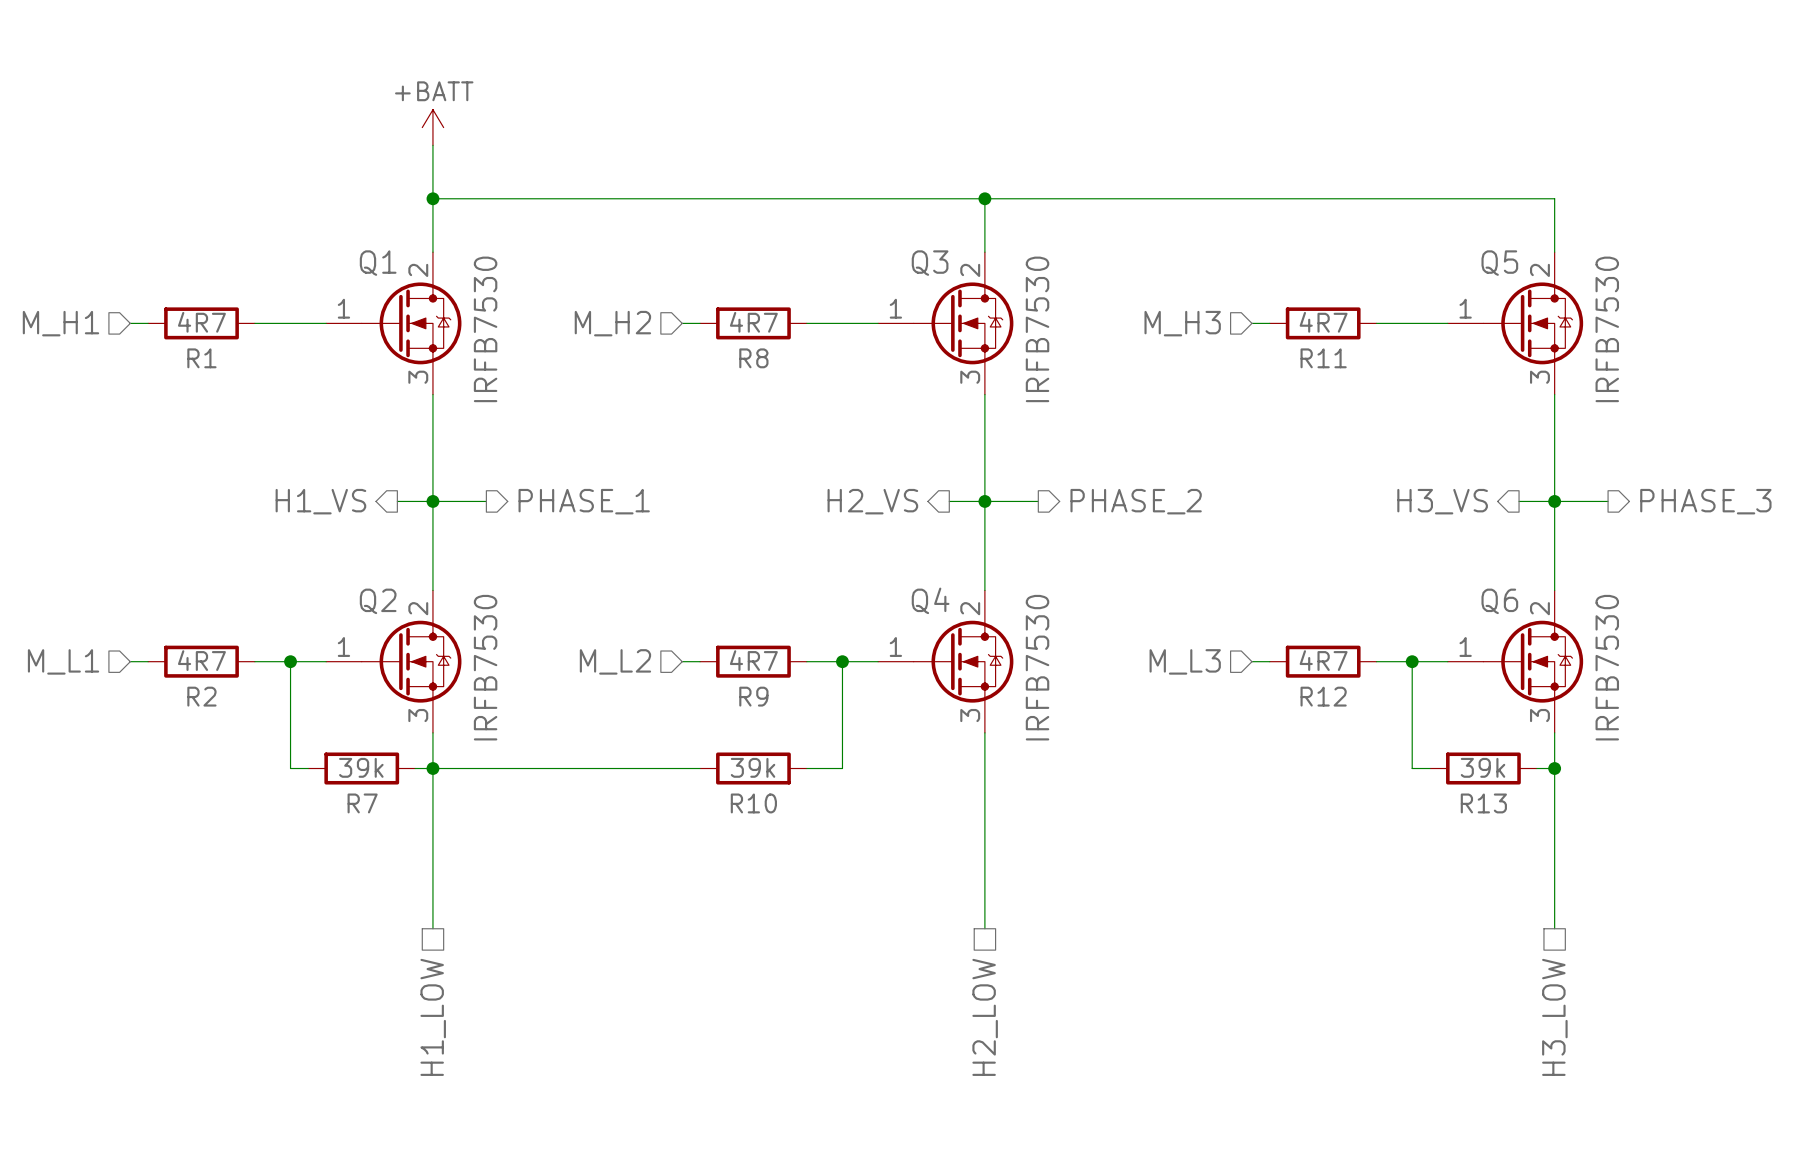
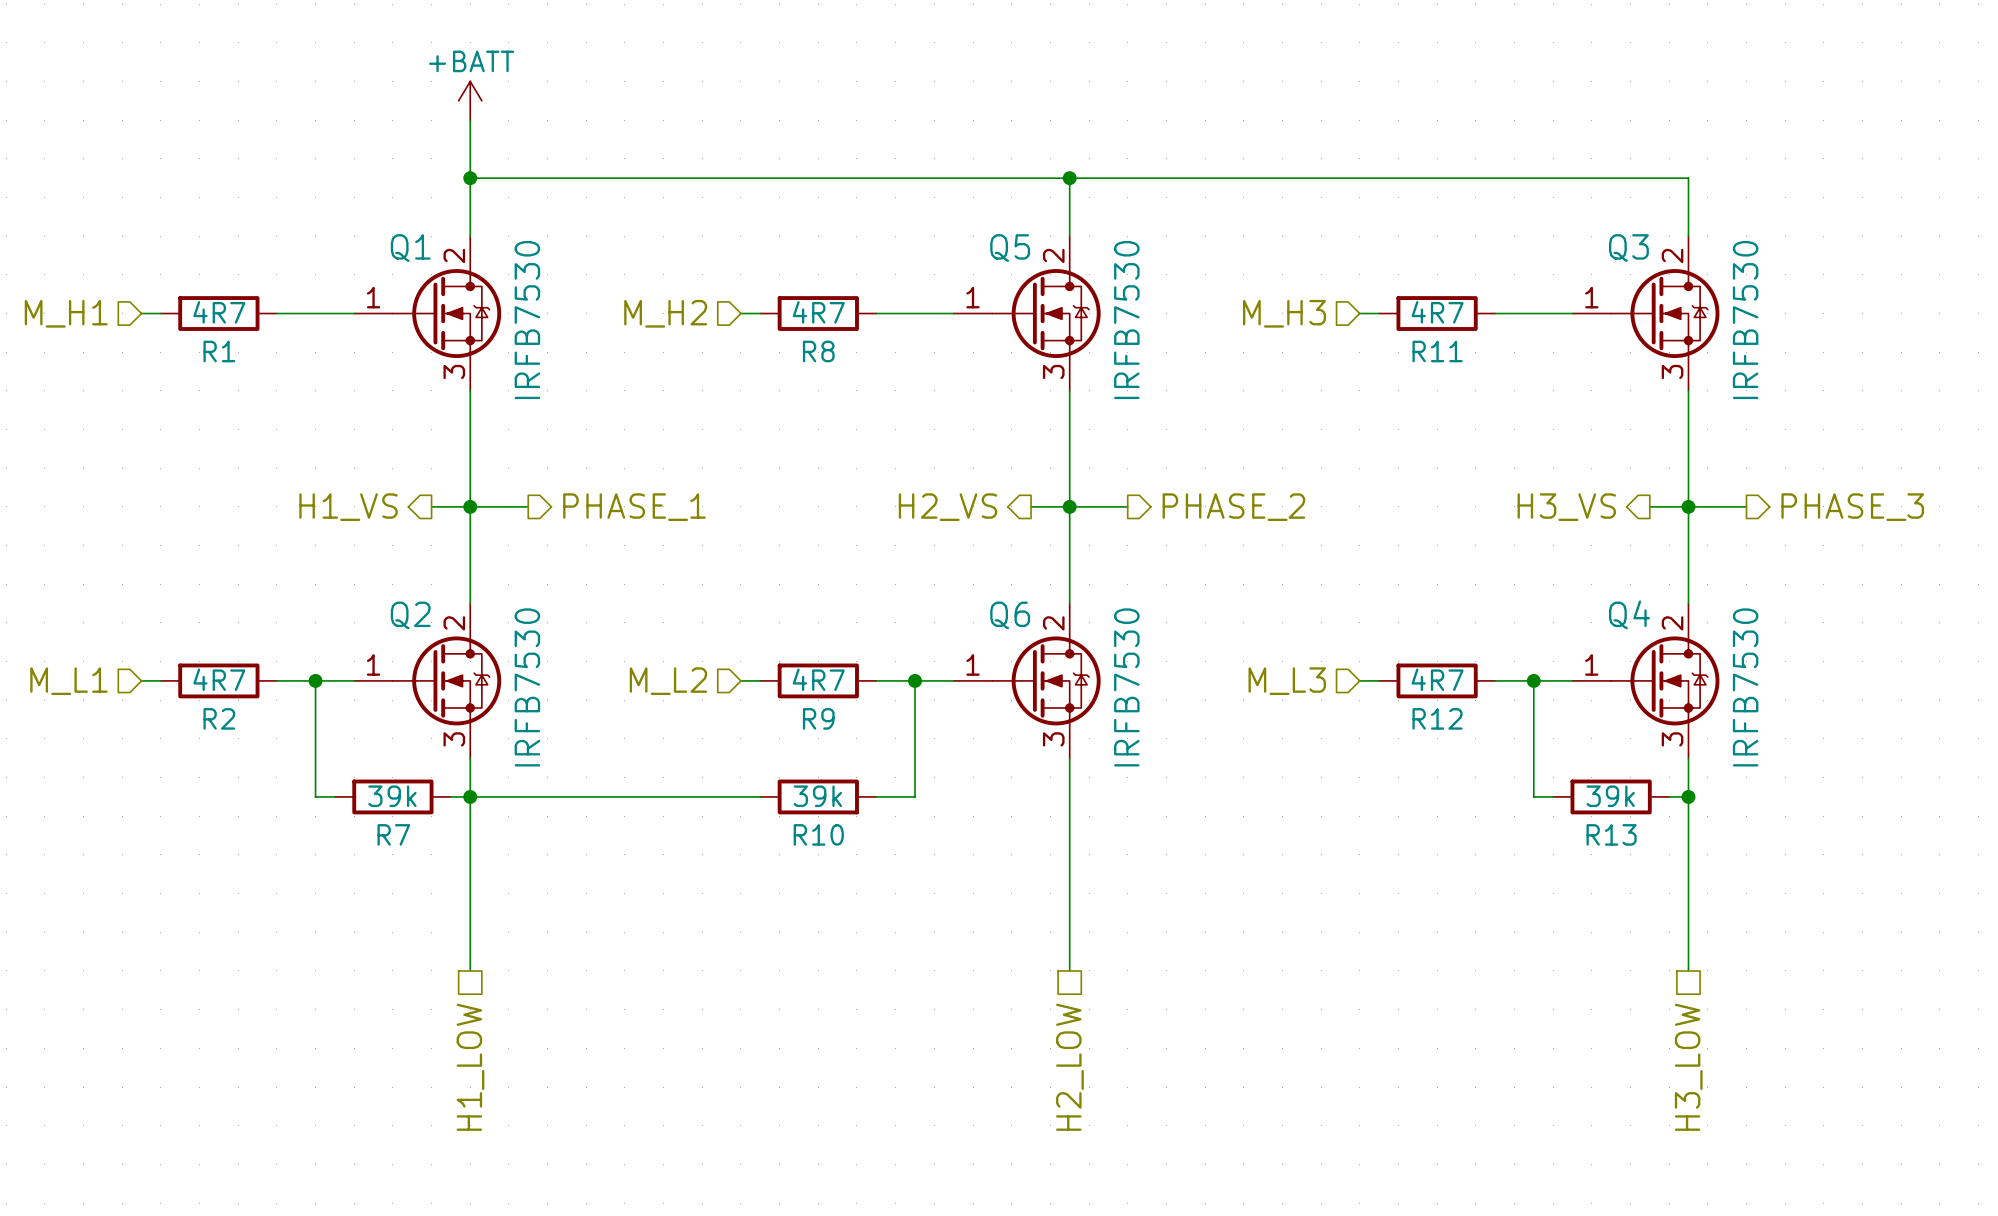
Q3 name: Q3 (930, 263) -> Q5 (1010, 248)
Q5 name: Q5 (1499, 263) -> Q3 (1628, 248)
Q4 name: Q4 (930, 600) -> Q6 (1010, 615)
Q6 name: Q6 (1499, 601) -> Q4 (1629, 614)

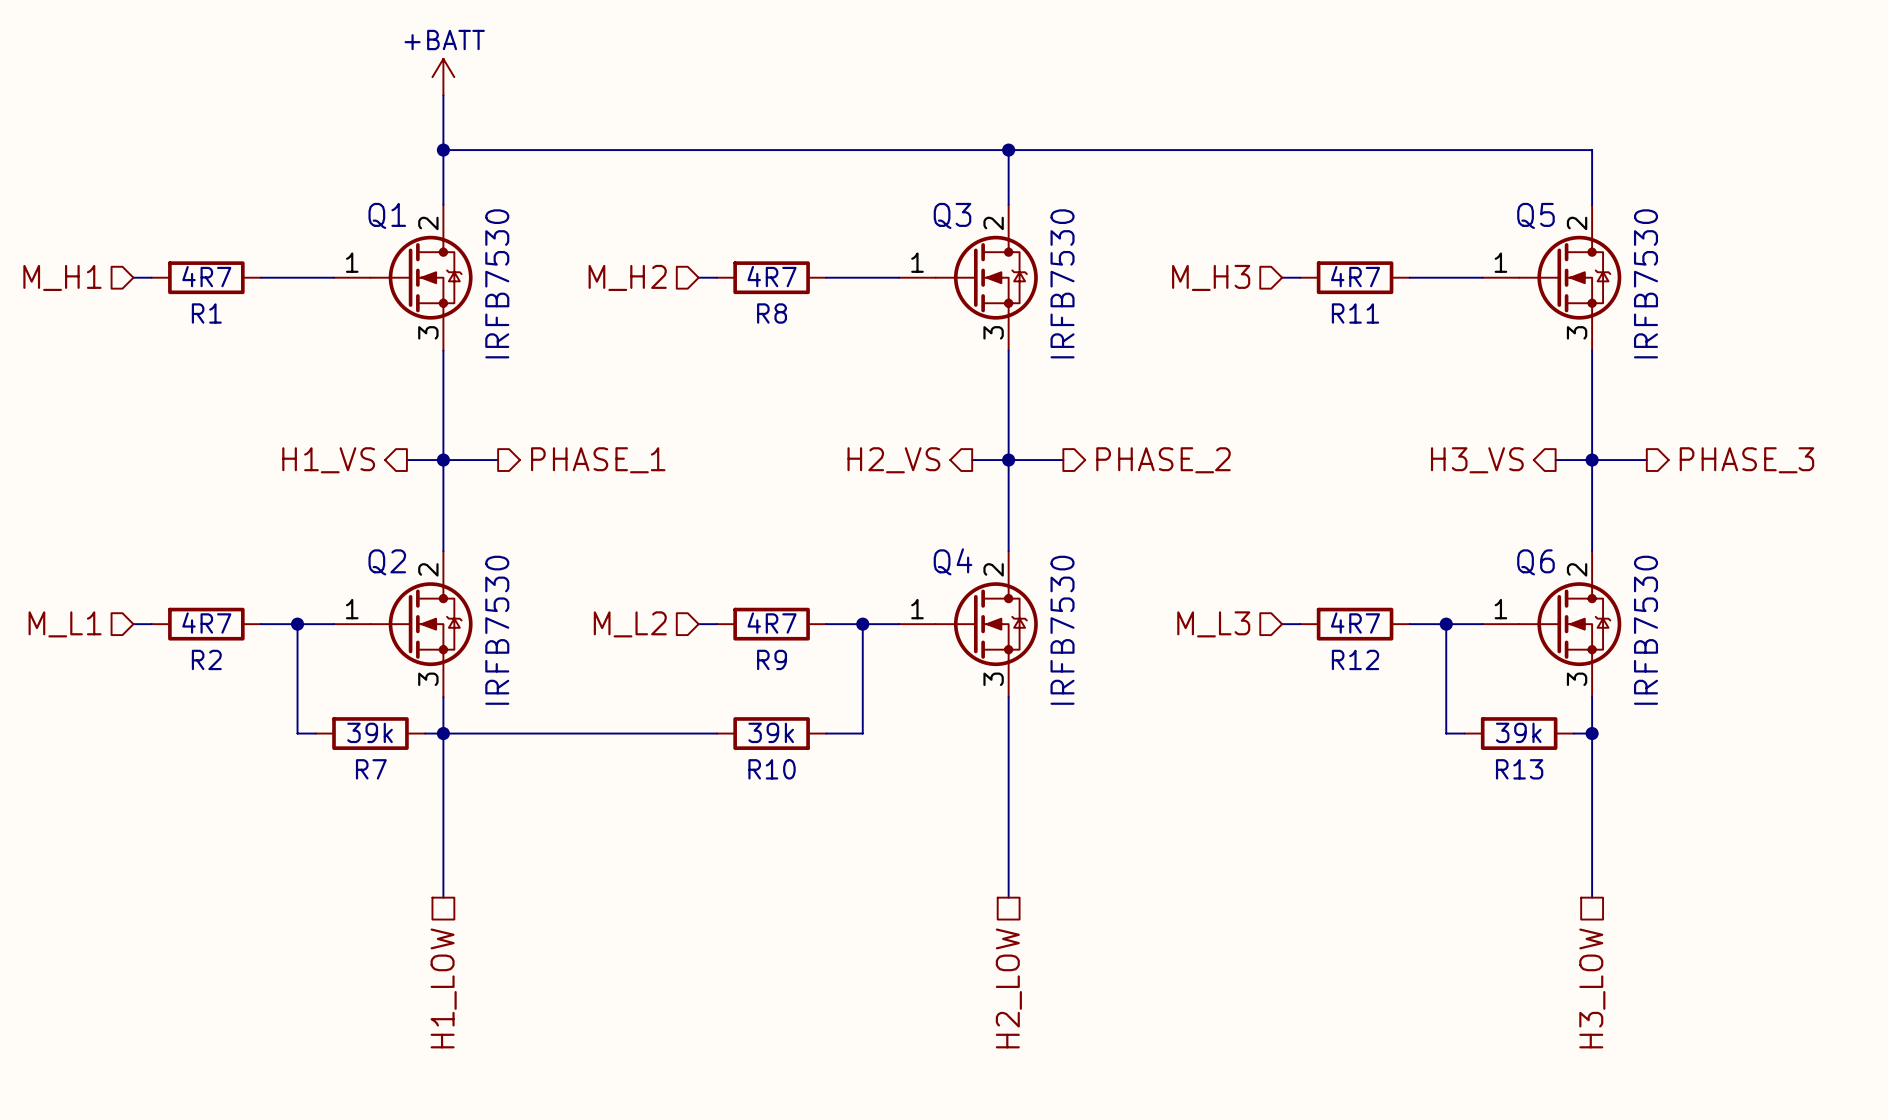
Q5 name: Q5 (1010, 248) -> Q3 (952, 215)
Q3 name: Q3 (1628, 248) -> Q5 (1535, 215)
Q4 name: Q4 (1629, 614) -> Q6 (1535, 562)
Q6 name: Q6 (1010, 615) -> Q4 (953, 561)

